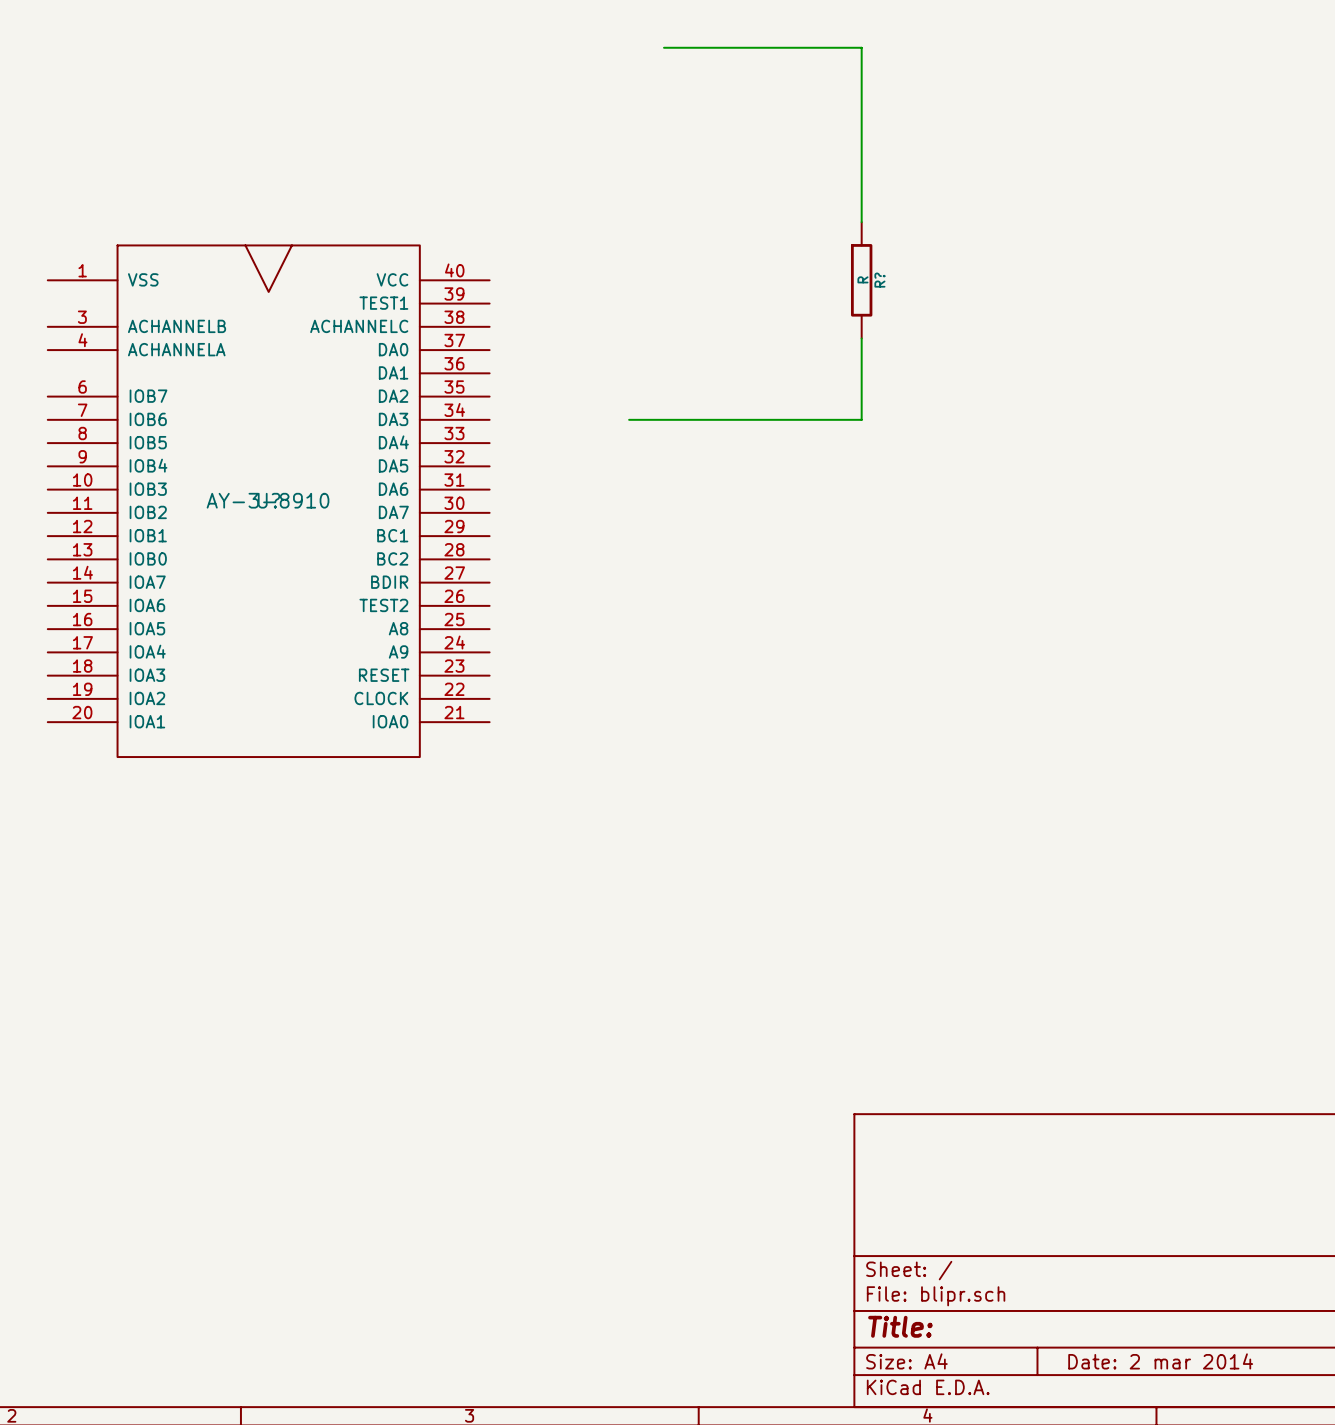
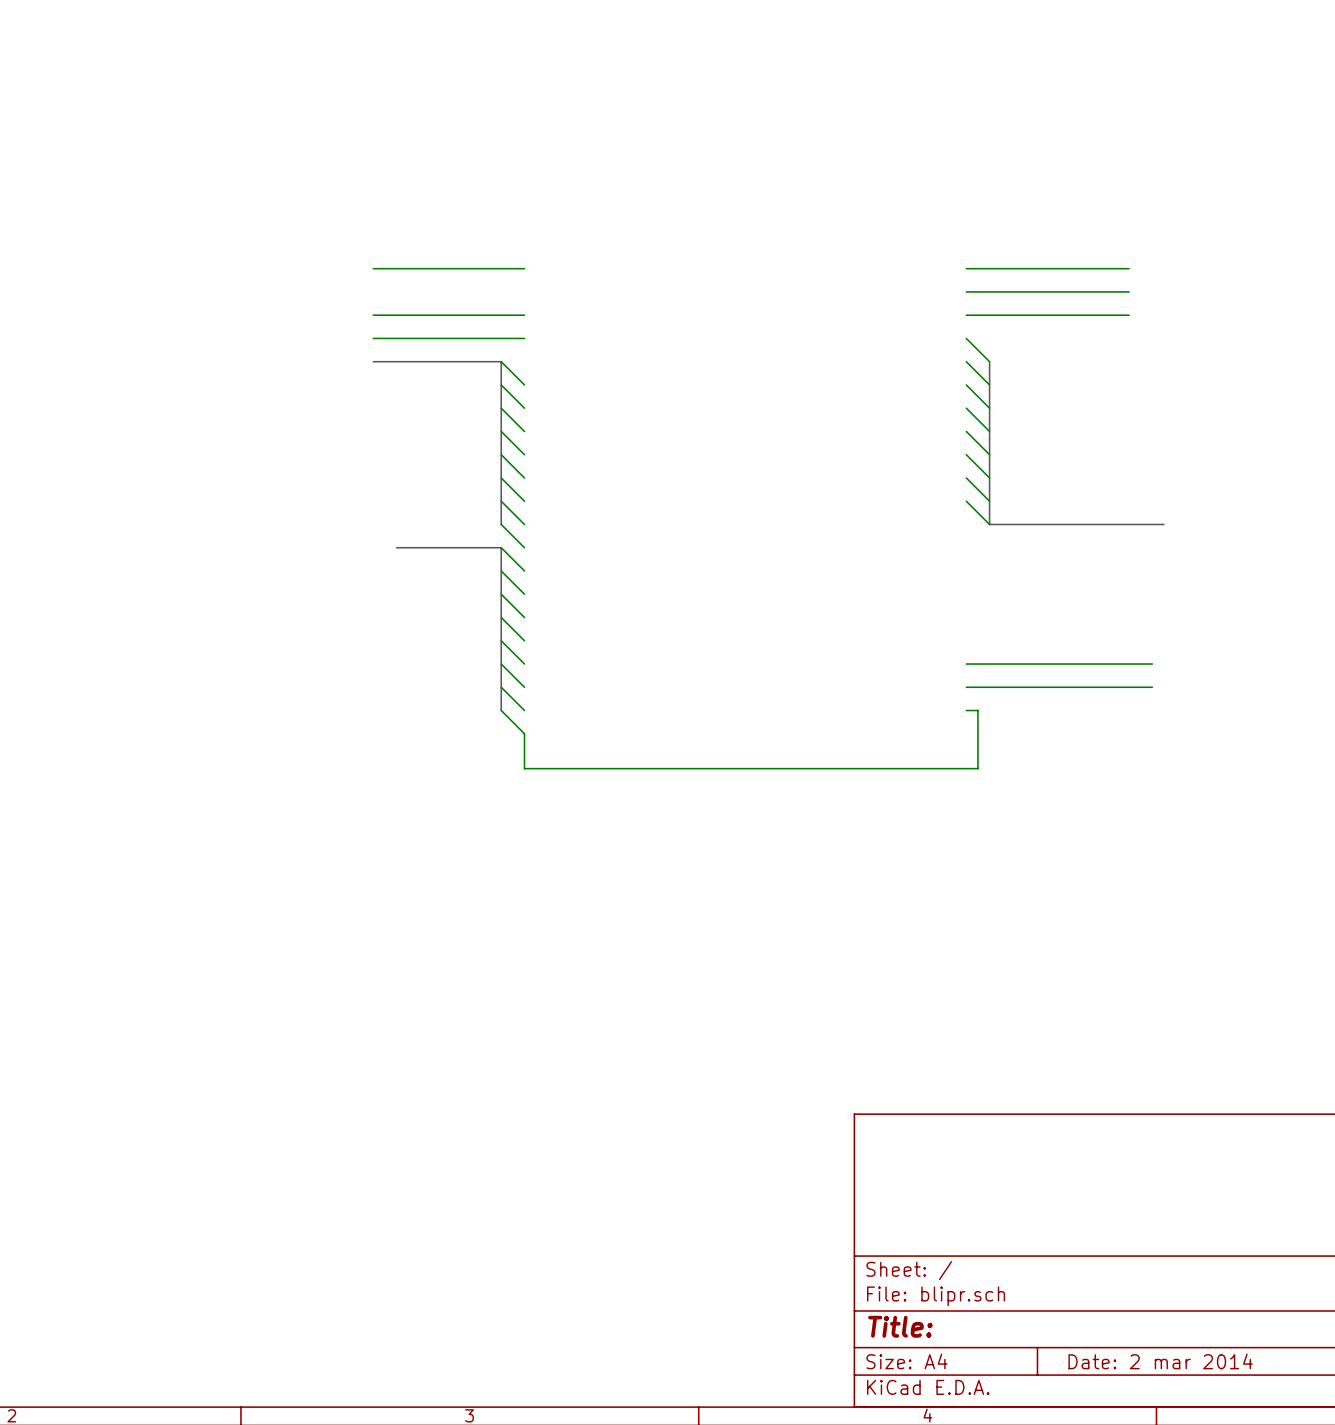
wire: (664, 47) (861, 47) (861, 222) -> none
wire: none -> (373, 268) (524, 268)
wire: none -> (966, 268) (1129, 268)
R?: R (861, 280) -> none
wire: none -> (966, 291) (1129, 291)
wire: none -> (373, 315) (524, 315)
wire: none -> (966, 315) (1129, 315)
wire: none -> (373, 338) (524, 338)
wire: (861, 338) (861, 419) (629, 419) -> none
wire: none -> (966, 338) (989, 361)
bus: none -> (373, 361) (501, 361) (501, 524)
wire: none -> (501, 361) (524, 384)
wire: none -> (966, 361) (989, 384)
bus: none -> (989, 361) (989, 524) (1163, 524)
wire: none -> (501, 384) (524, 408)
wire: none -> (966, 384) (989, 408)
wire: none -> (501, 408) (524, 431)
wire: none -> (966, 408) (989, 431)
wire: none -> (501, 431) (524, 454)
wire: none -> (966, 431) (989, 454)
wire: none -> (501, 454) (524, 477)
wire: none -> (966, 454) (989, 477)
wire: none -> (501, 477) (524, 501)
wire: none -> (966, 477) (989, 501)
U?: AY-3-8910 (268, 501) -> none
wire: none -> (501, 501) (524, 524)
wire: none -> (966, 501) (989, 524)
wire: none -> (501, 524) (524, 547)
bus: none -> (396, 547) (501, 547) (501, 710)
wire: none -> (501, 547) (524, 571)
wire: none -> (501, 571) (524, 594)
wire: none -> (501, 594) (524, 617)
wire: none -> (501, 617) (524, 640)
wire: none -> (501, 640) (524, 664)
wire: none -> (501, 664) (524, 687)
wire: none -> (966, 664) (1152, 664)
wire: none -> (501, 687) (524, 710)
wire: none -> (966, 687) (1152, 687)
wire: none -> (501, 710) (524, 733) (524, 768) (977, 768) (977, 710) (966, 710)

